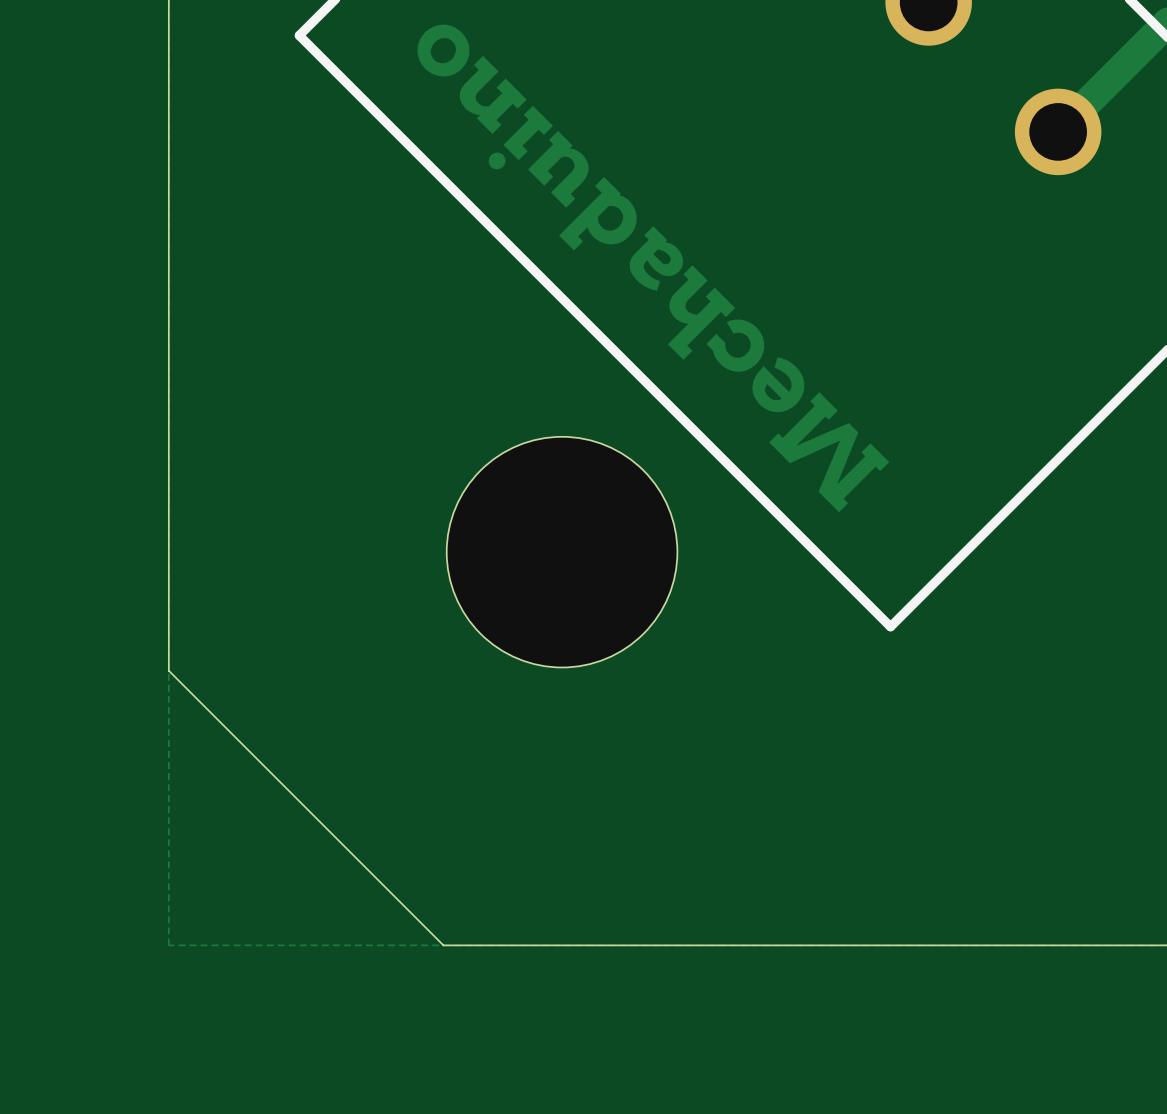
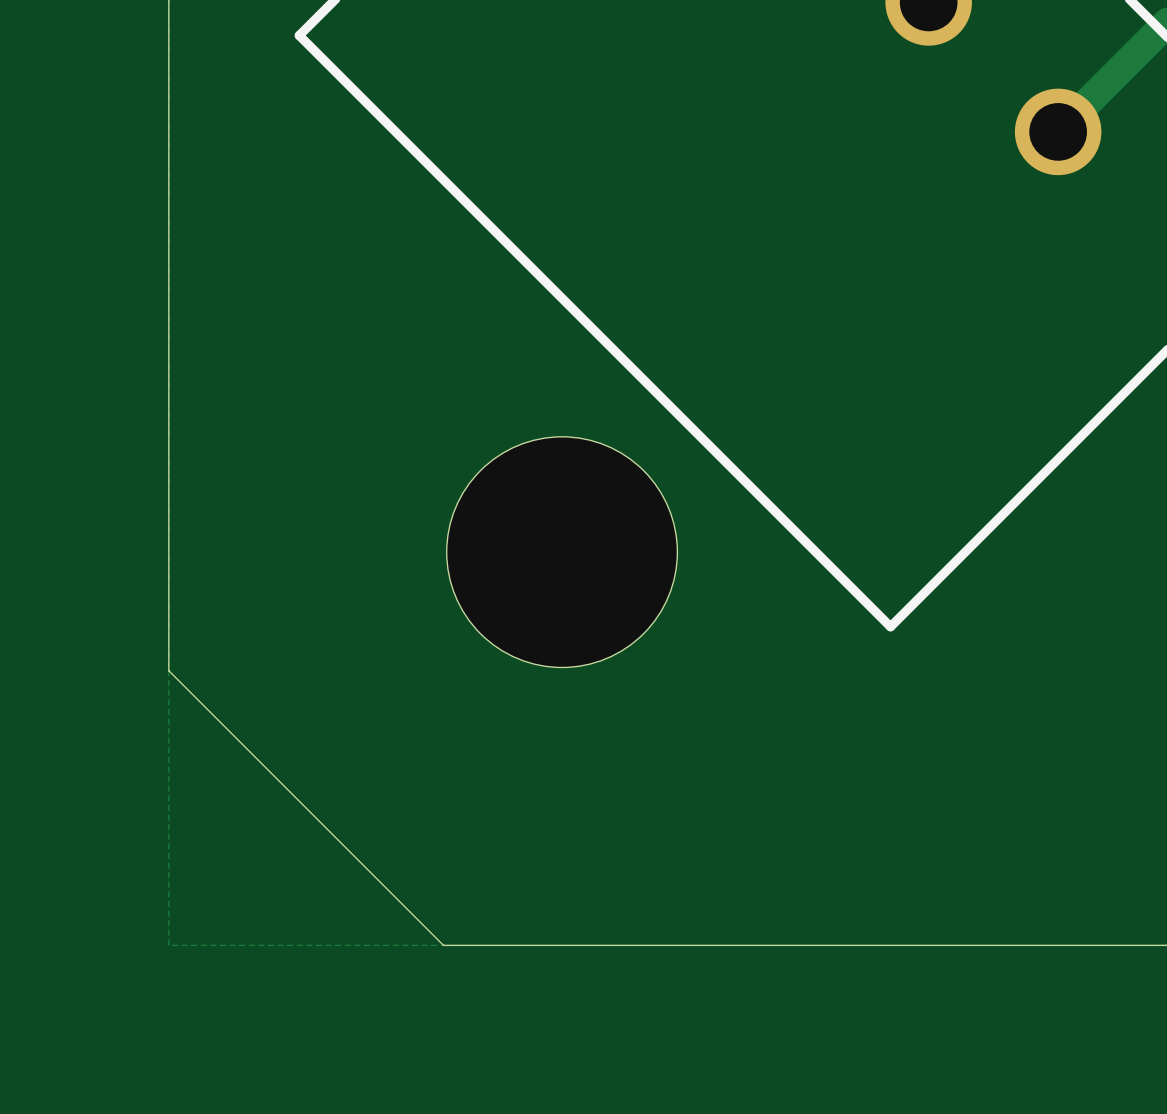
drawing: [417, 24, 890, 513] -> none

